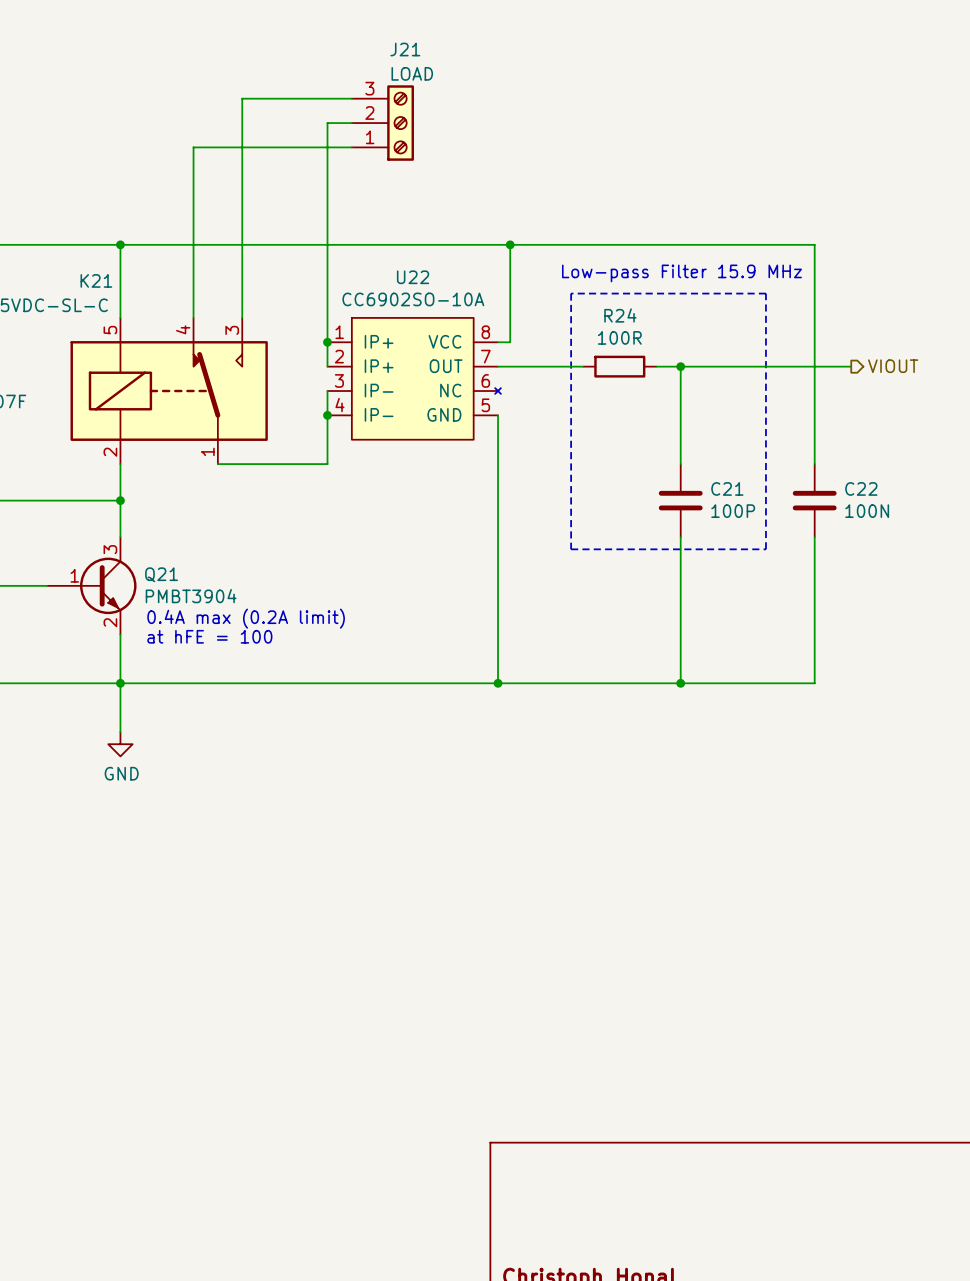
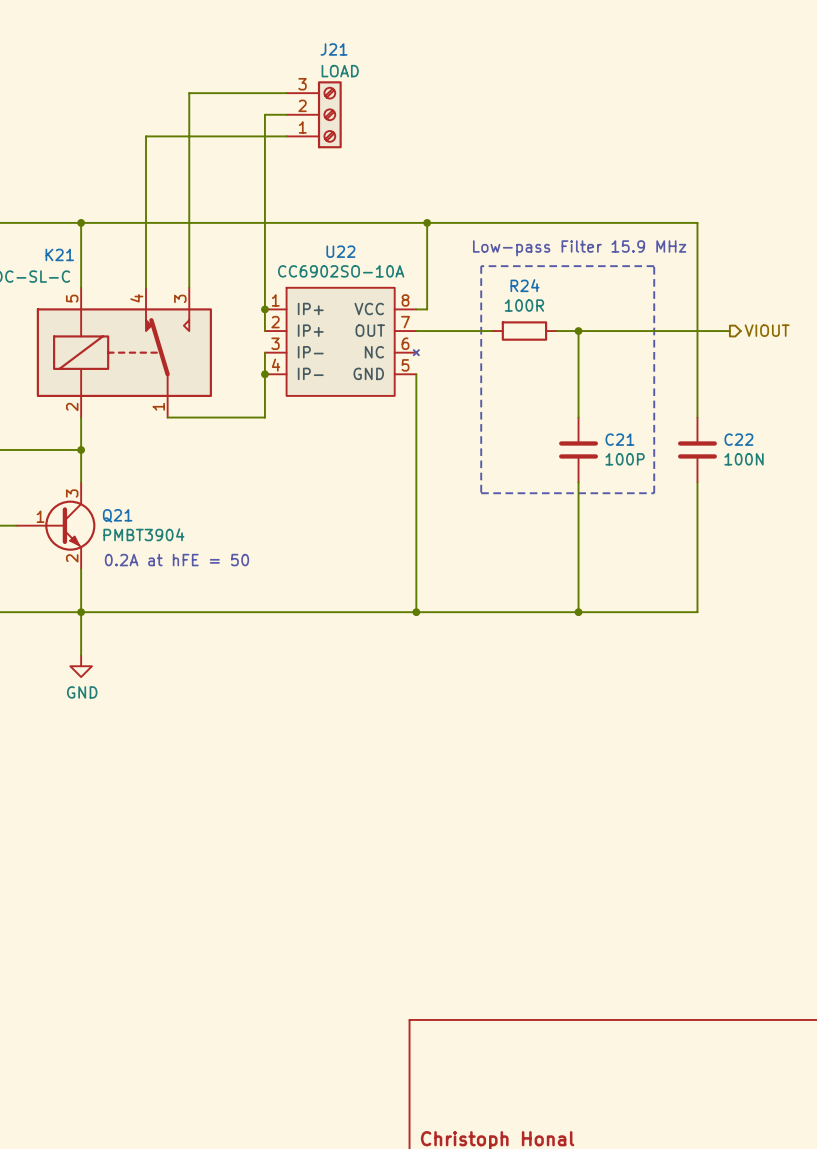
text: 0.4A max (0.2A limit) (246, 618) -> none
text: at hFE = 100 (209, 636) -> 0.2A at hFE = 50 (176, 560)

